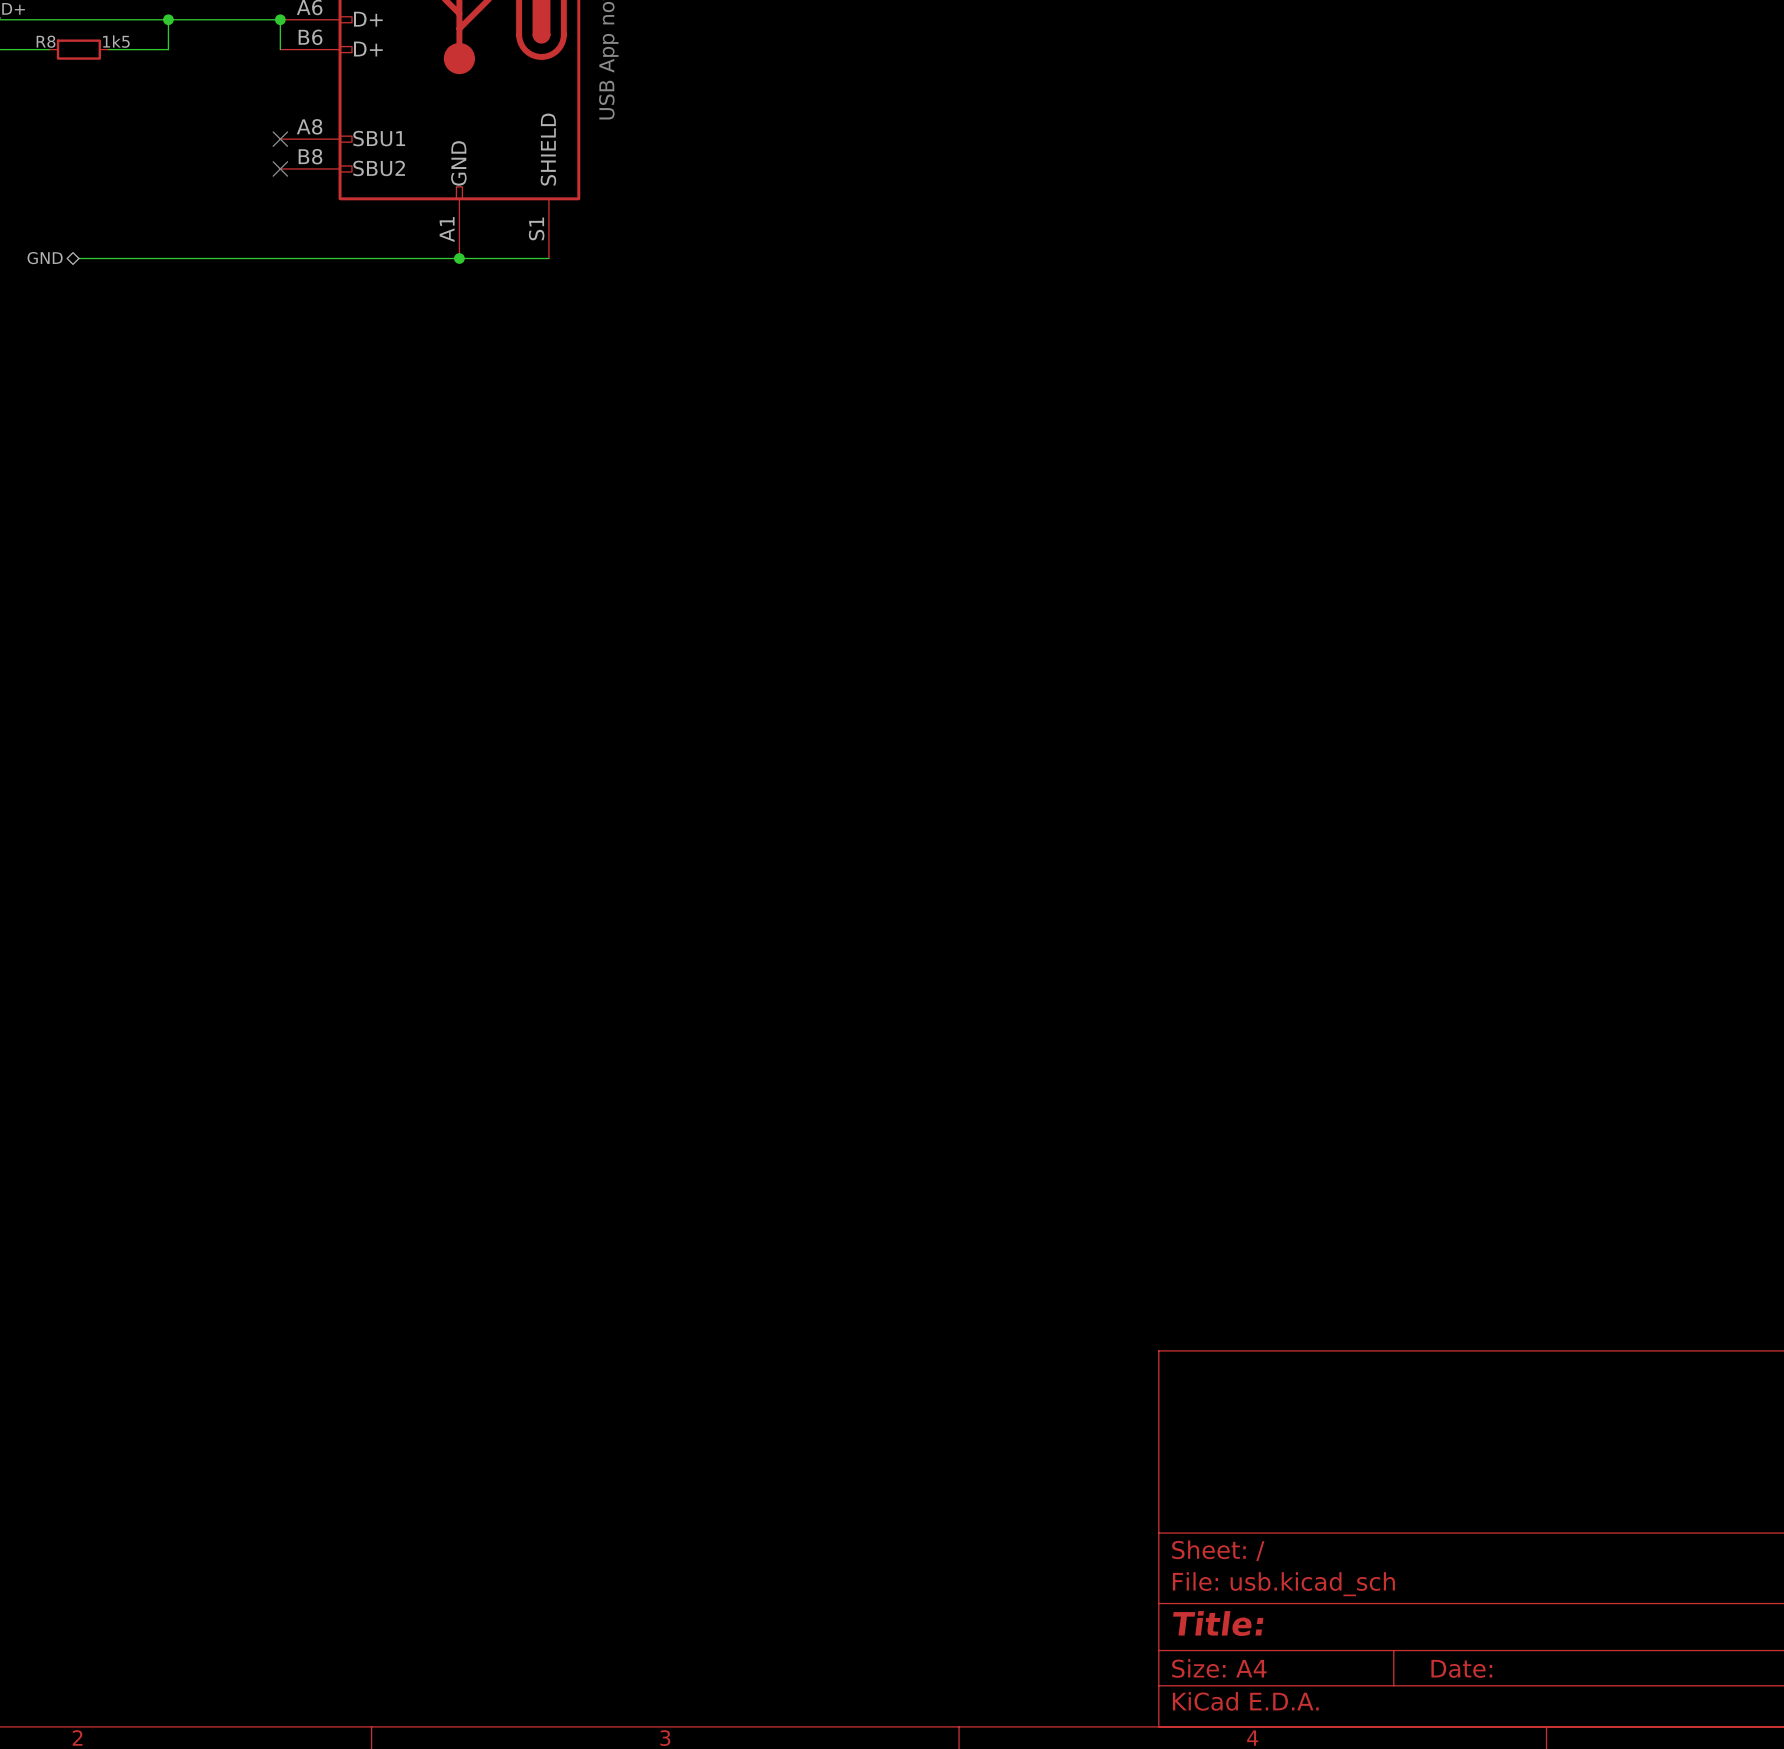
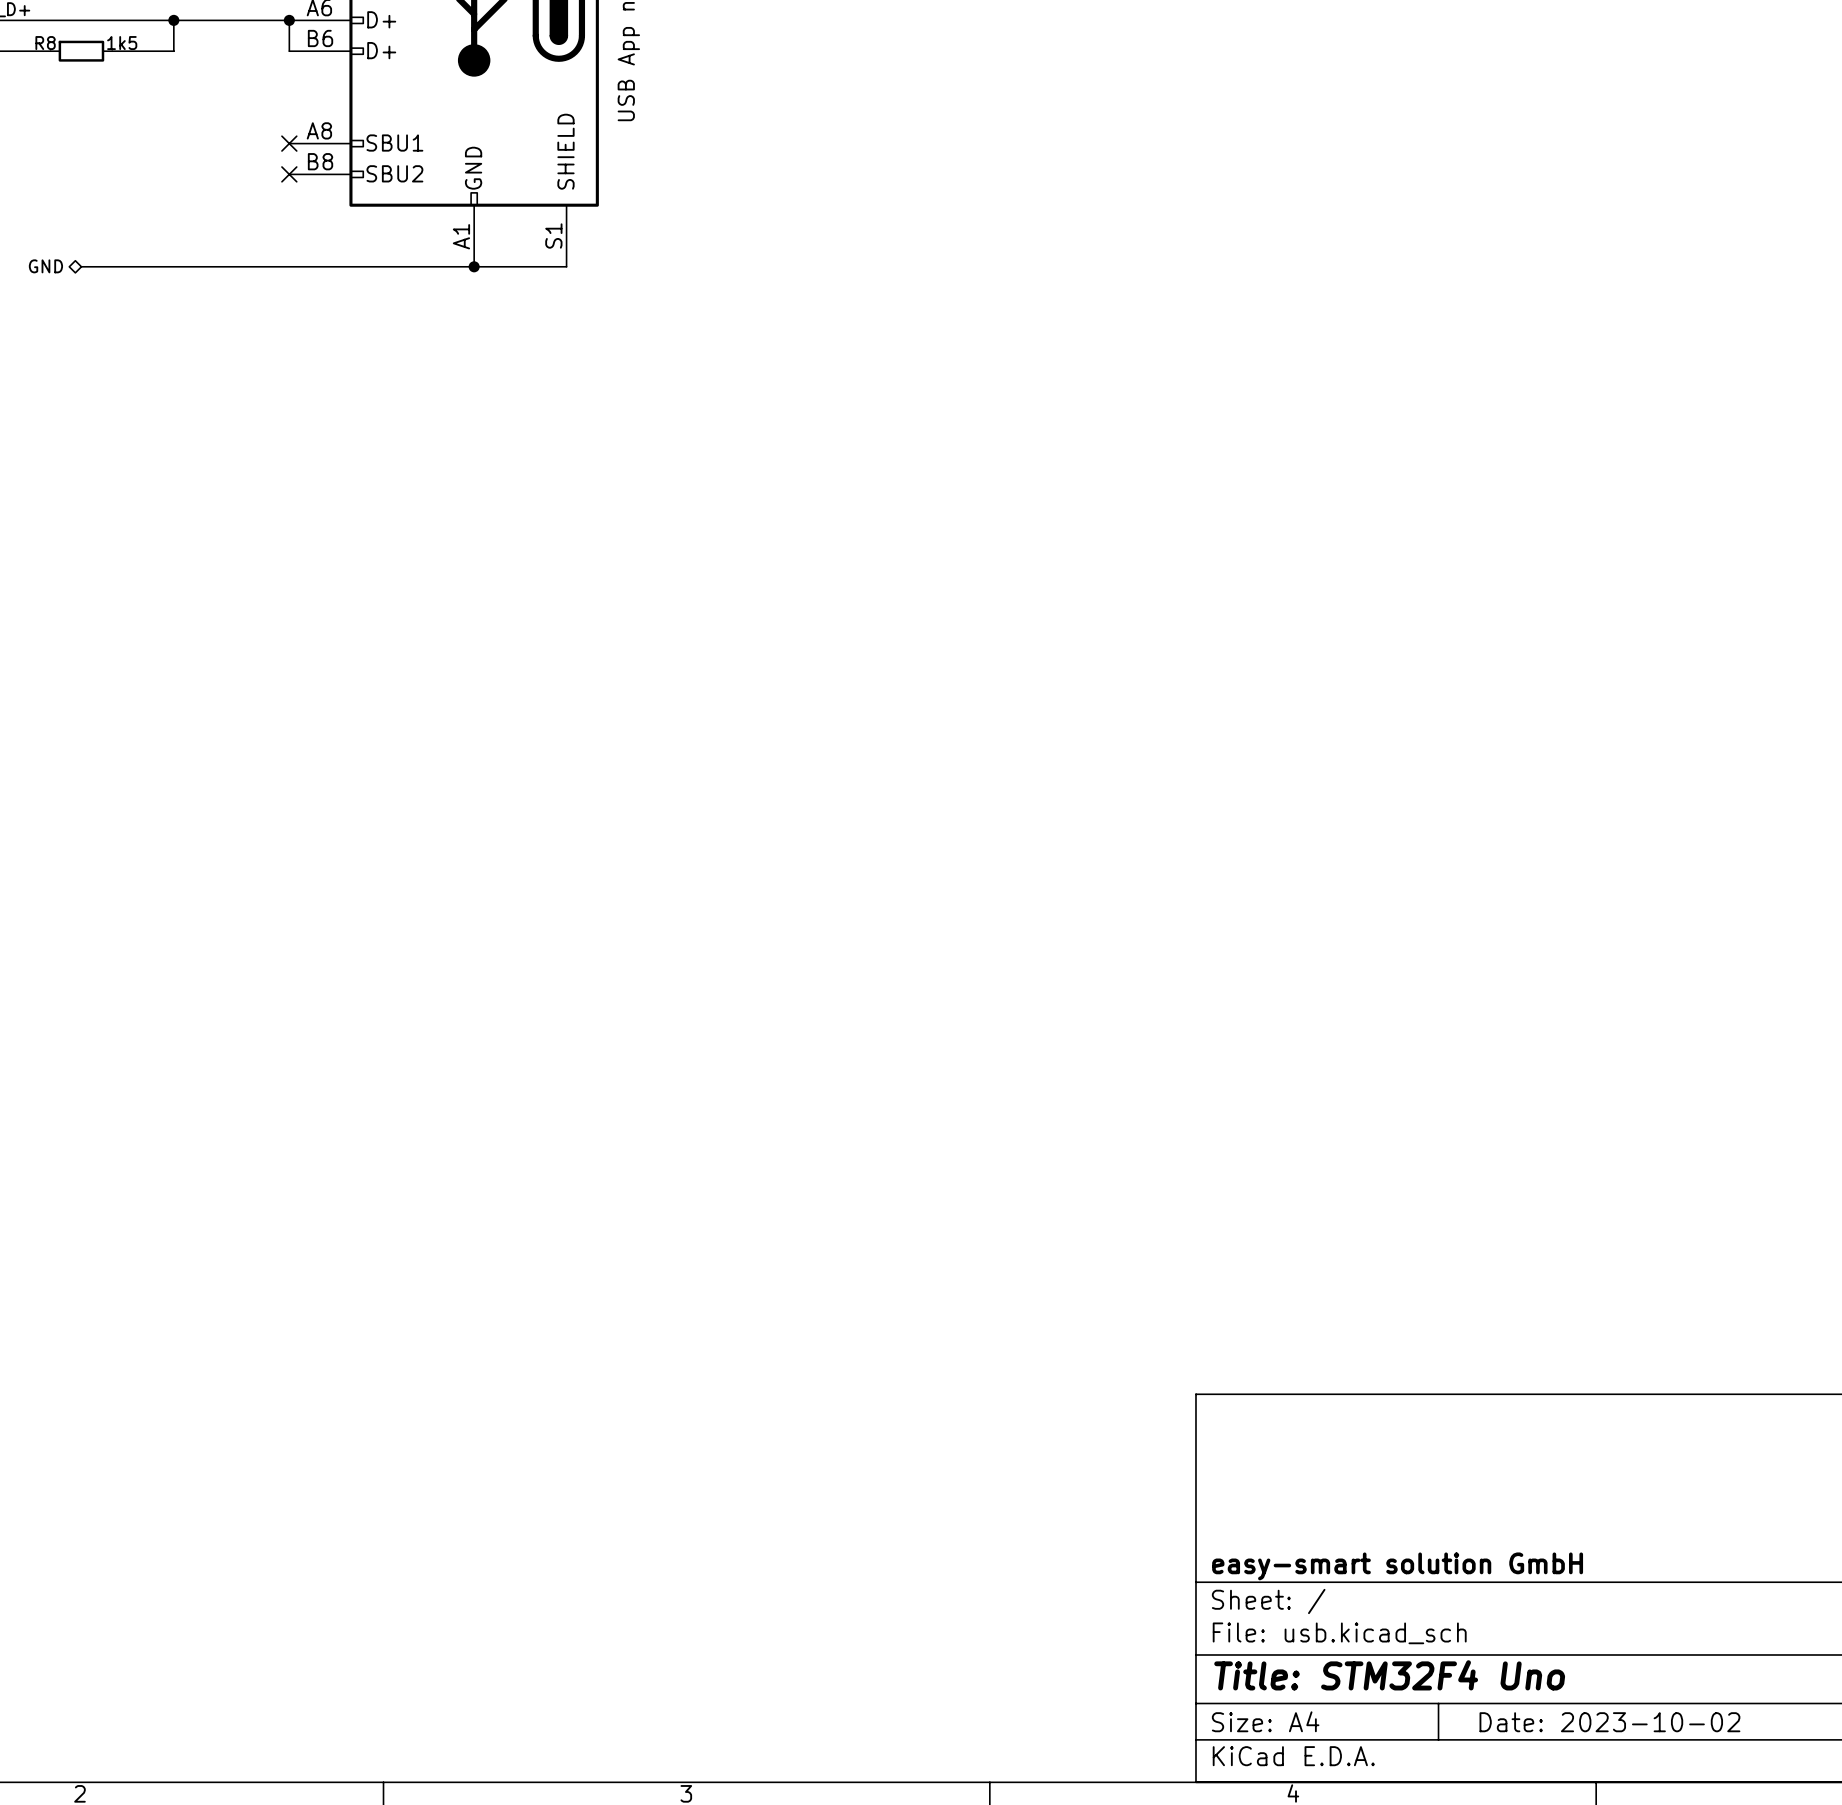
title block: none -> easy-smart solution GmbH (1397, 1566)
title block: Title: (1218, 1623) -> Title: STM32F4 Uno (1389, 1675)
title block: Date: (1461, 1668) -> Date: 2023-10-02 (1609, 1722)

